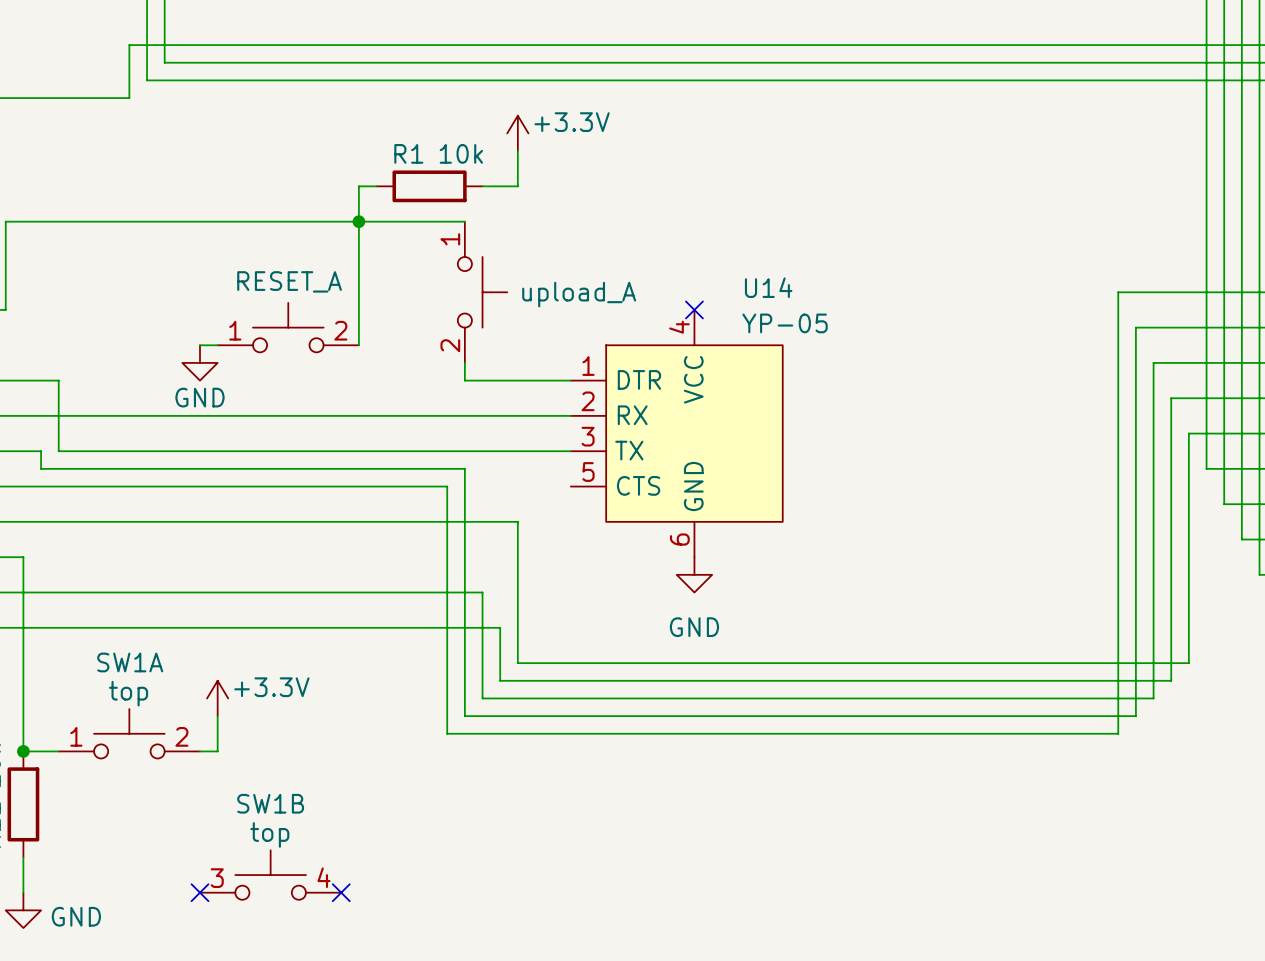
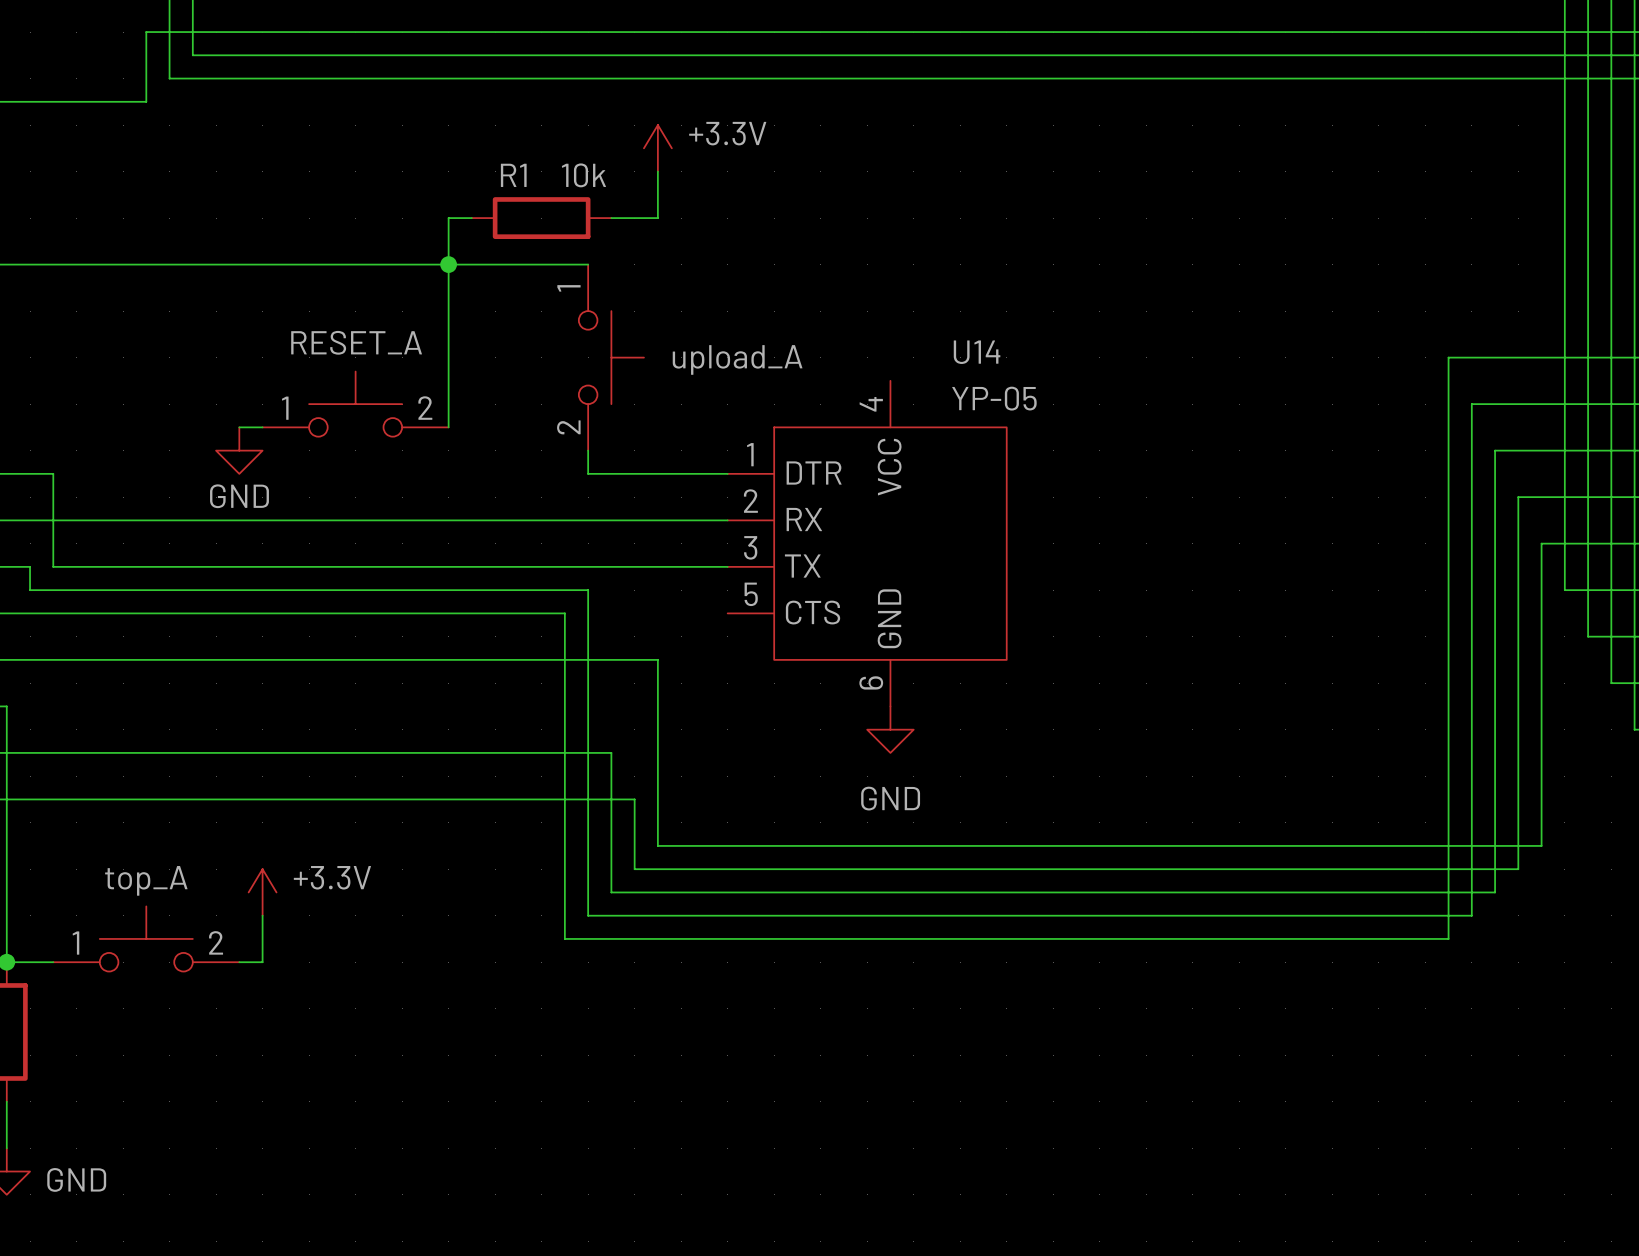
no-connect mark: (694, 309) -> none
SW1A name: SW1A (130, 662) -> top_A (146, 880)
SW1A value: top (128, 693) -> none
SW1B: top (270, 875) -> none
no-connect mark: (200, 892) -> none
no-connect mark: (341, 892) -> none

